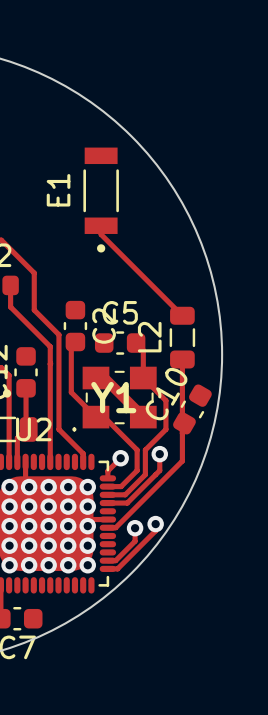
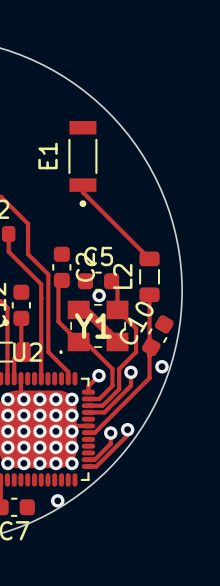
via: none -> (99, 295)
via: none -> (161, 366)
via: none -> (57, 500)

